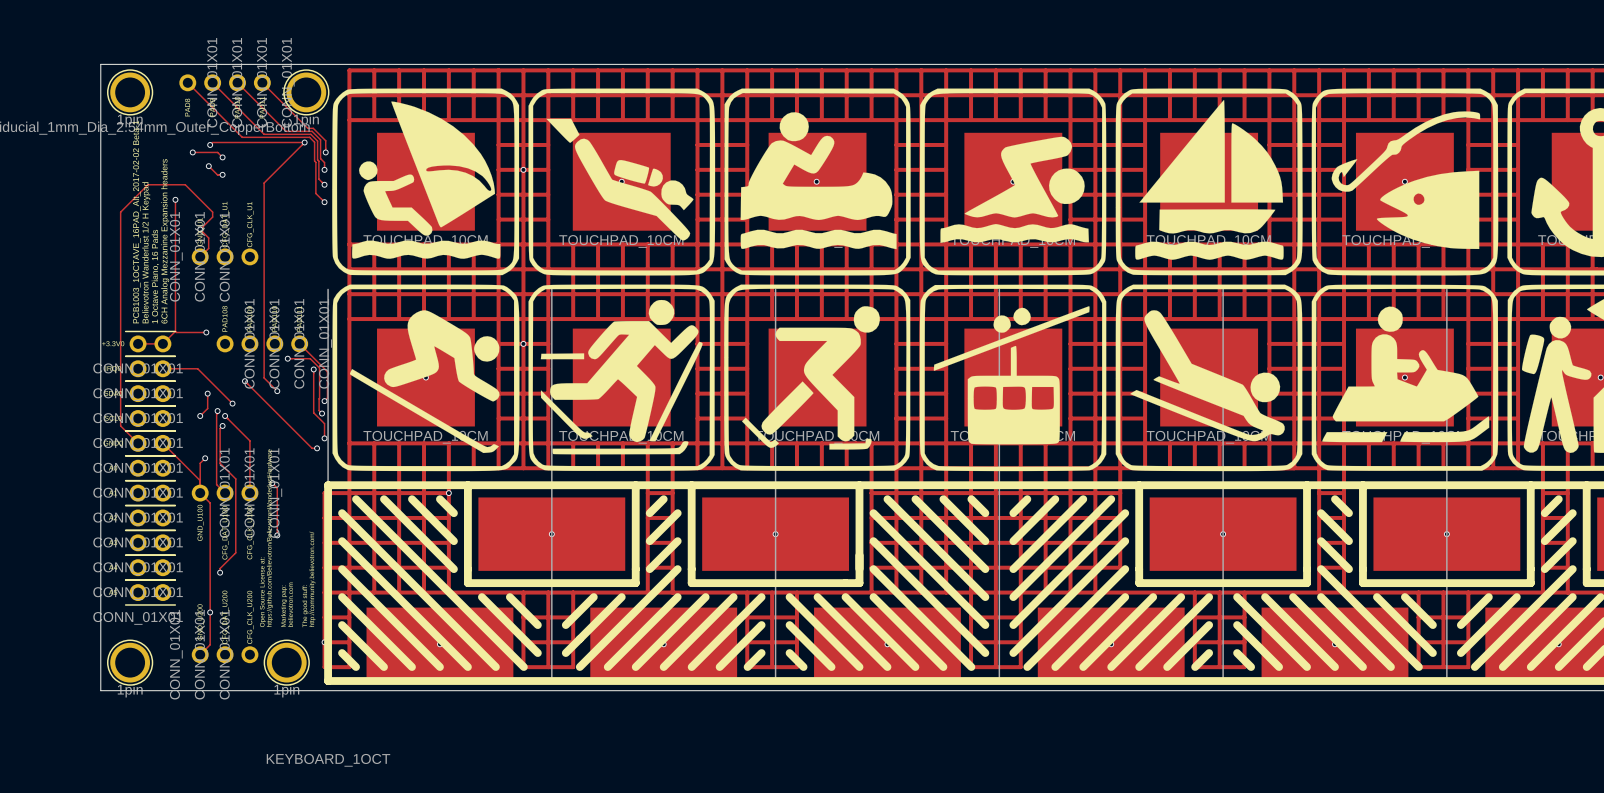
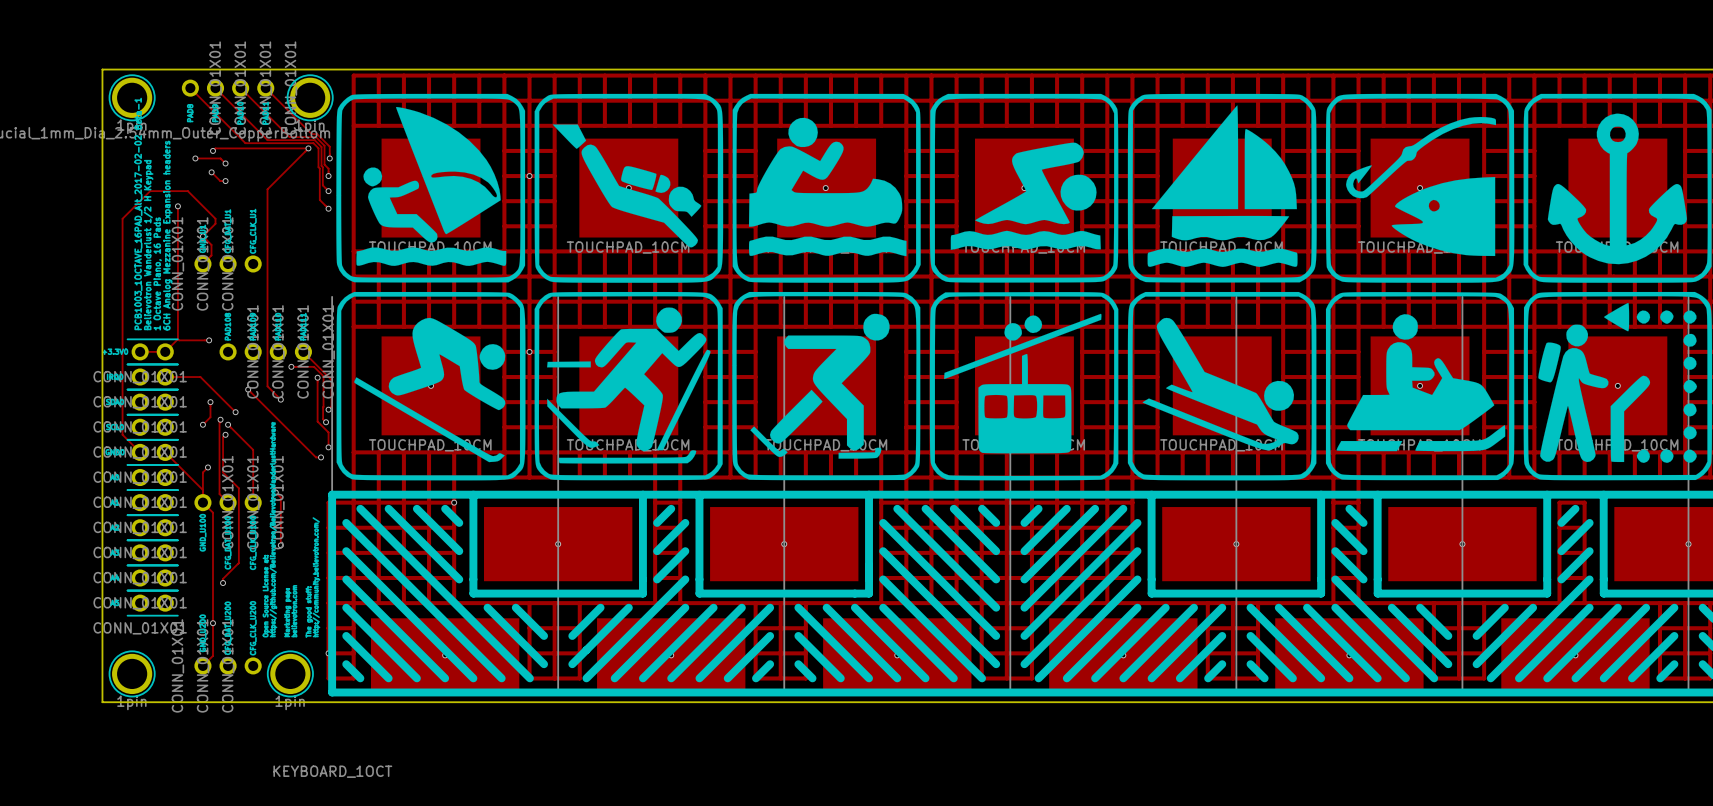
track: (1542, 468) (1542, 493) -> none
track: (1567, 468) (1567, 493) -> none

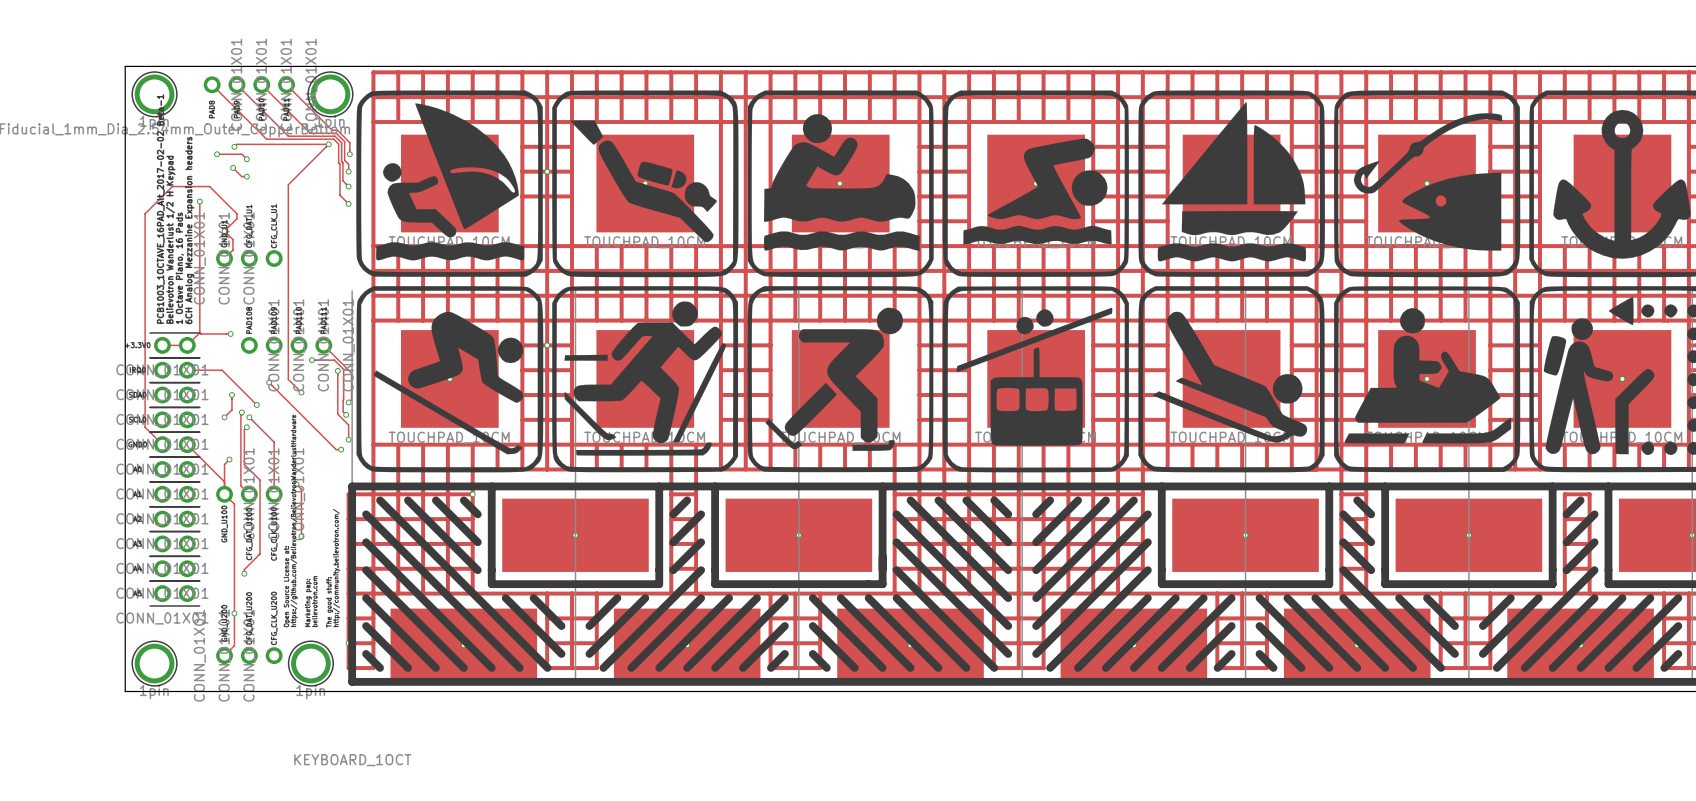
track: (705, 150) (755, 150) -> none
track: (705, 176) (755, 176) -> none
track: (705, 201) (755, 201) -> none
track: (504, 226) (554, 226) -> none
track: (705, 226) (755, 226) -> none

